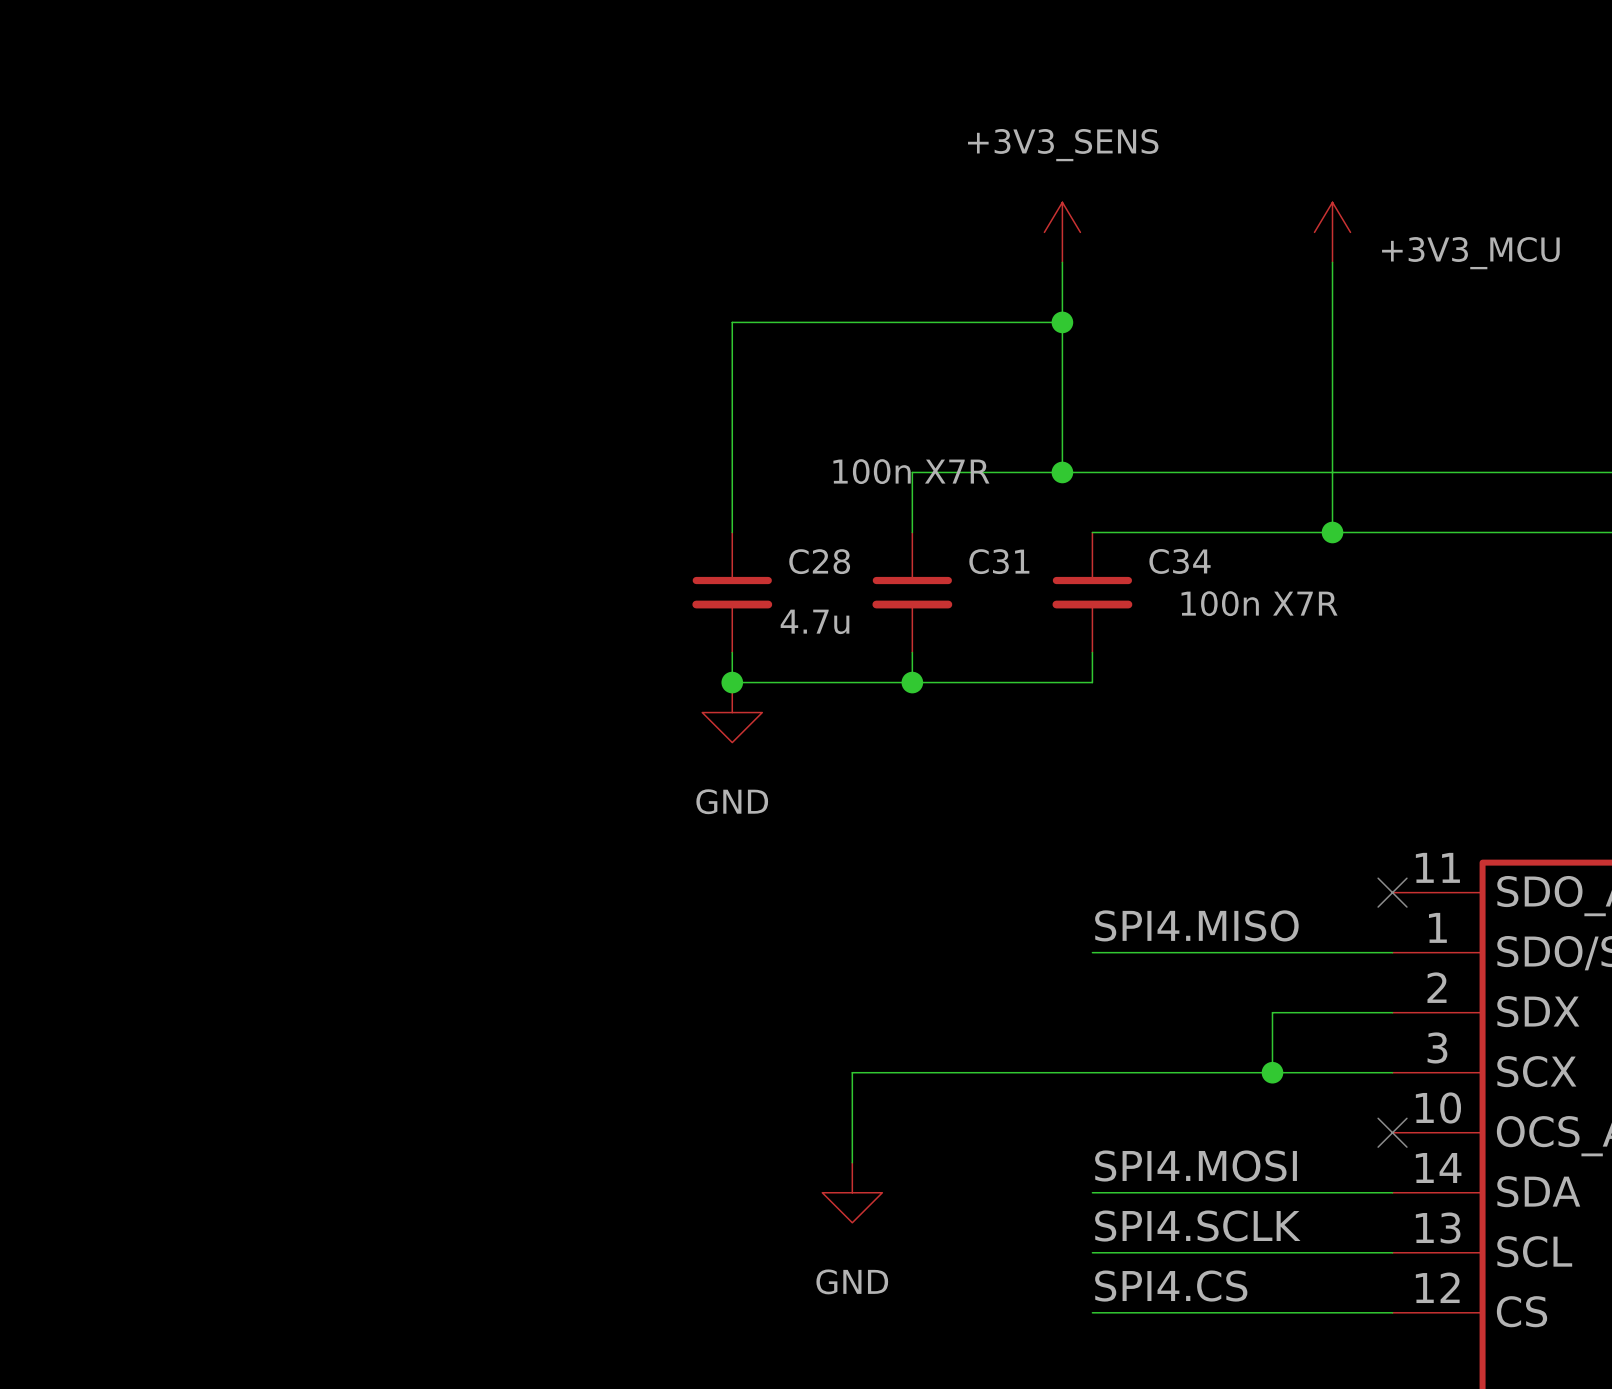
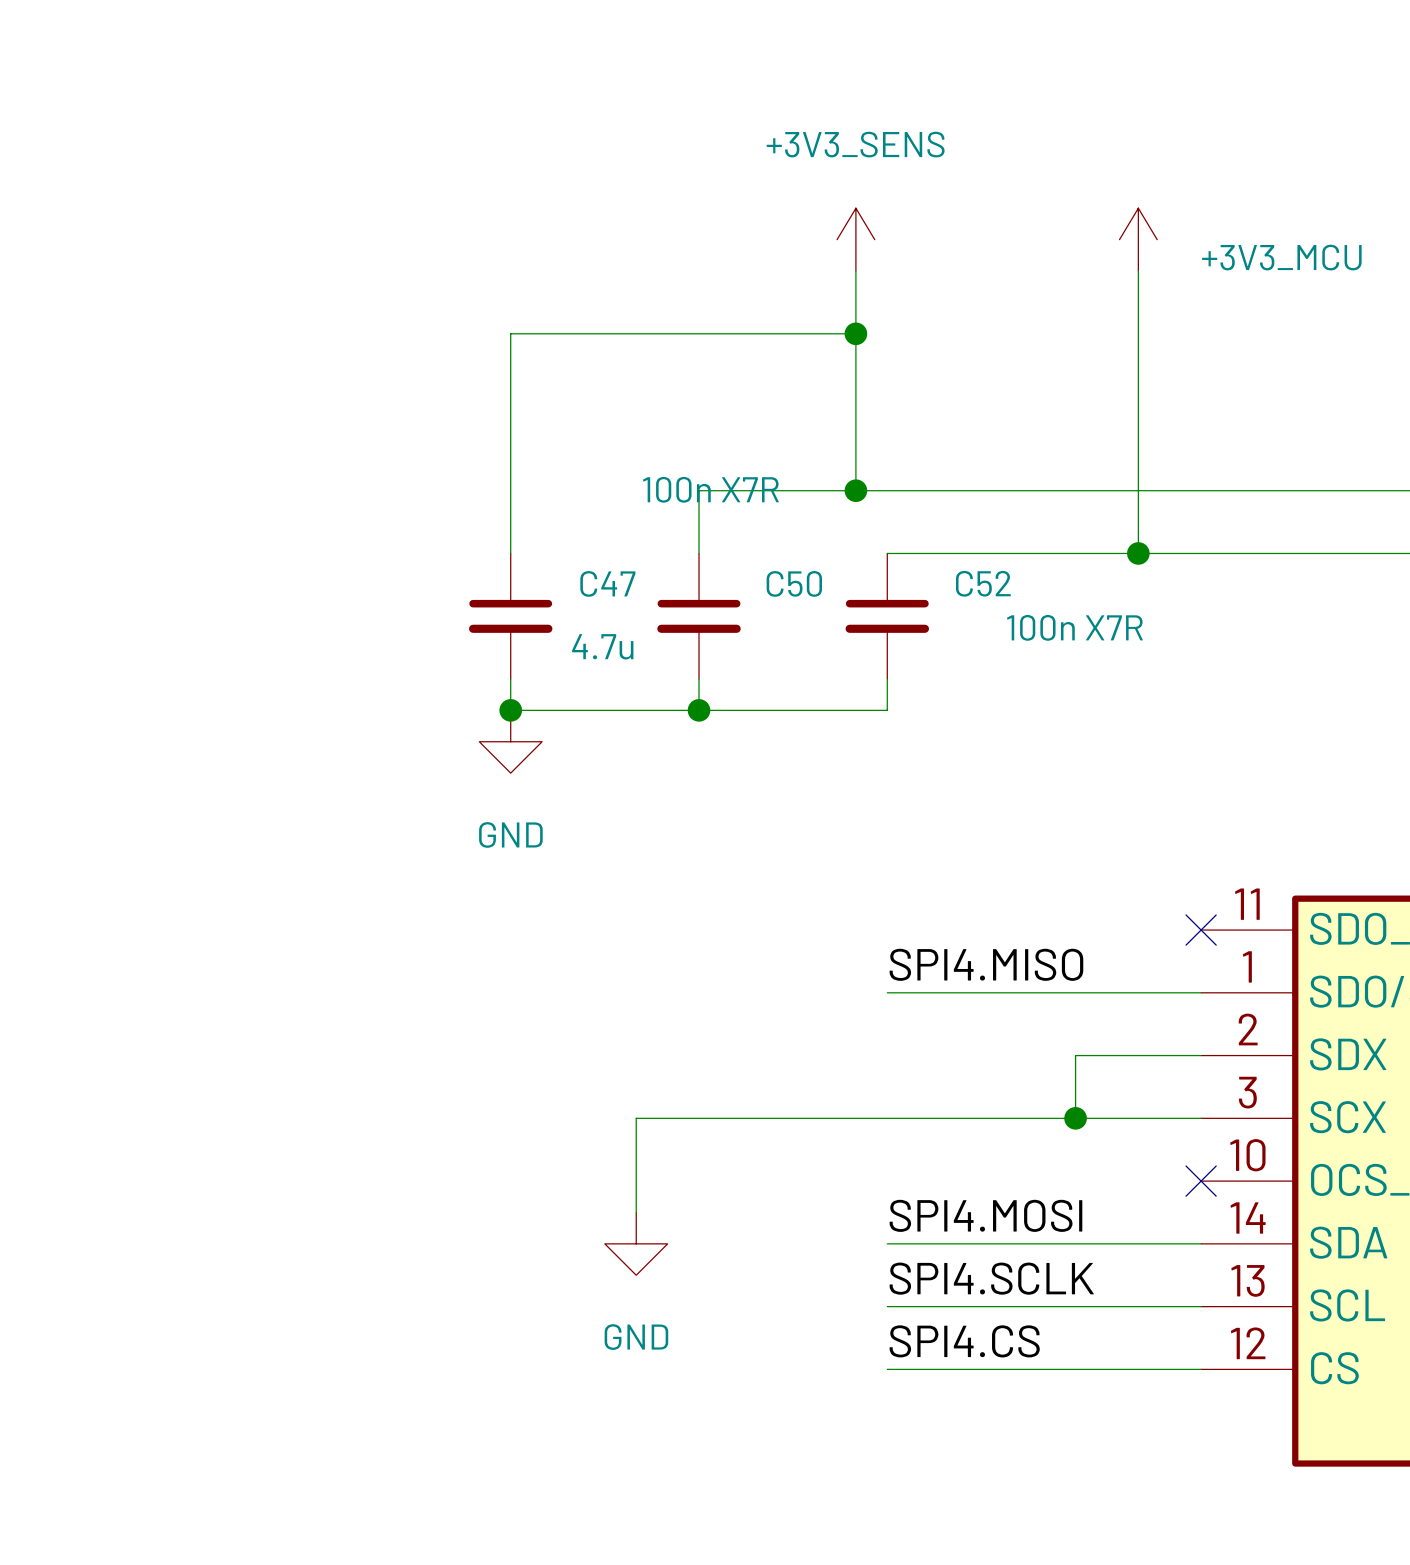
C28 name: C28 (819, 561) -> C47 (607, 583)
C31 name: C31 (999, 561) -> C50 (794, 583)
C34 name: C34 (1180, 561) -> C52 (983, 583)

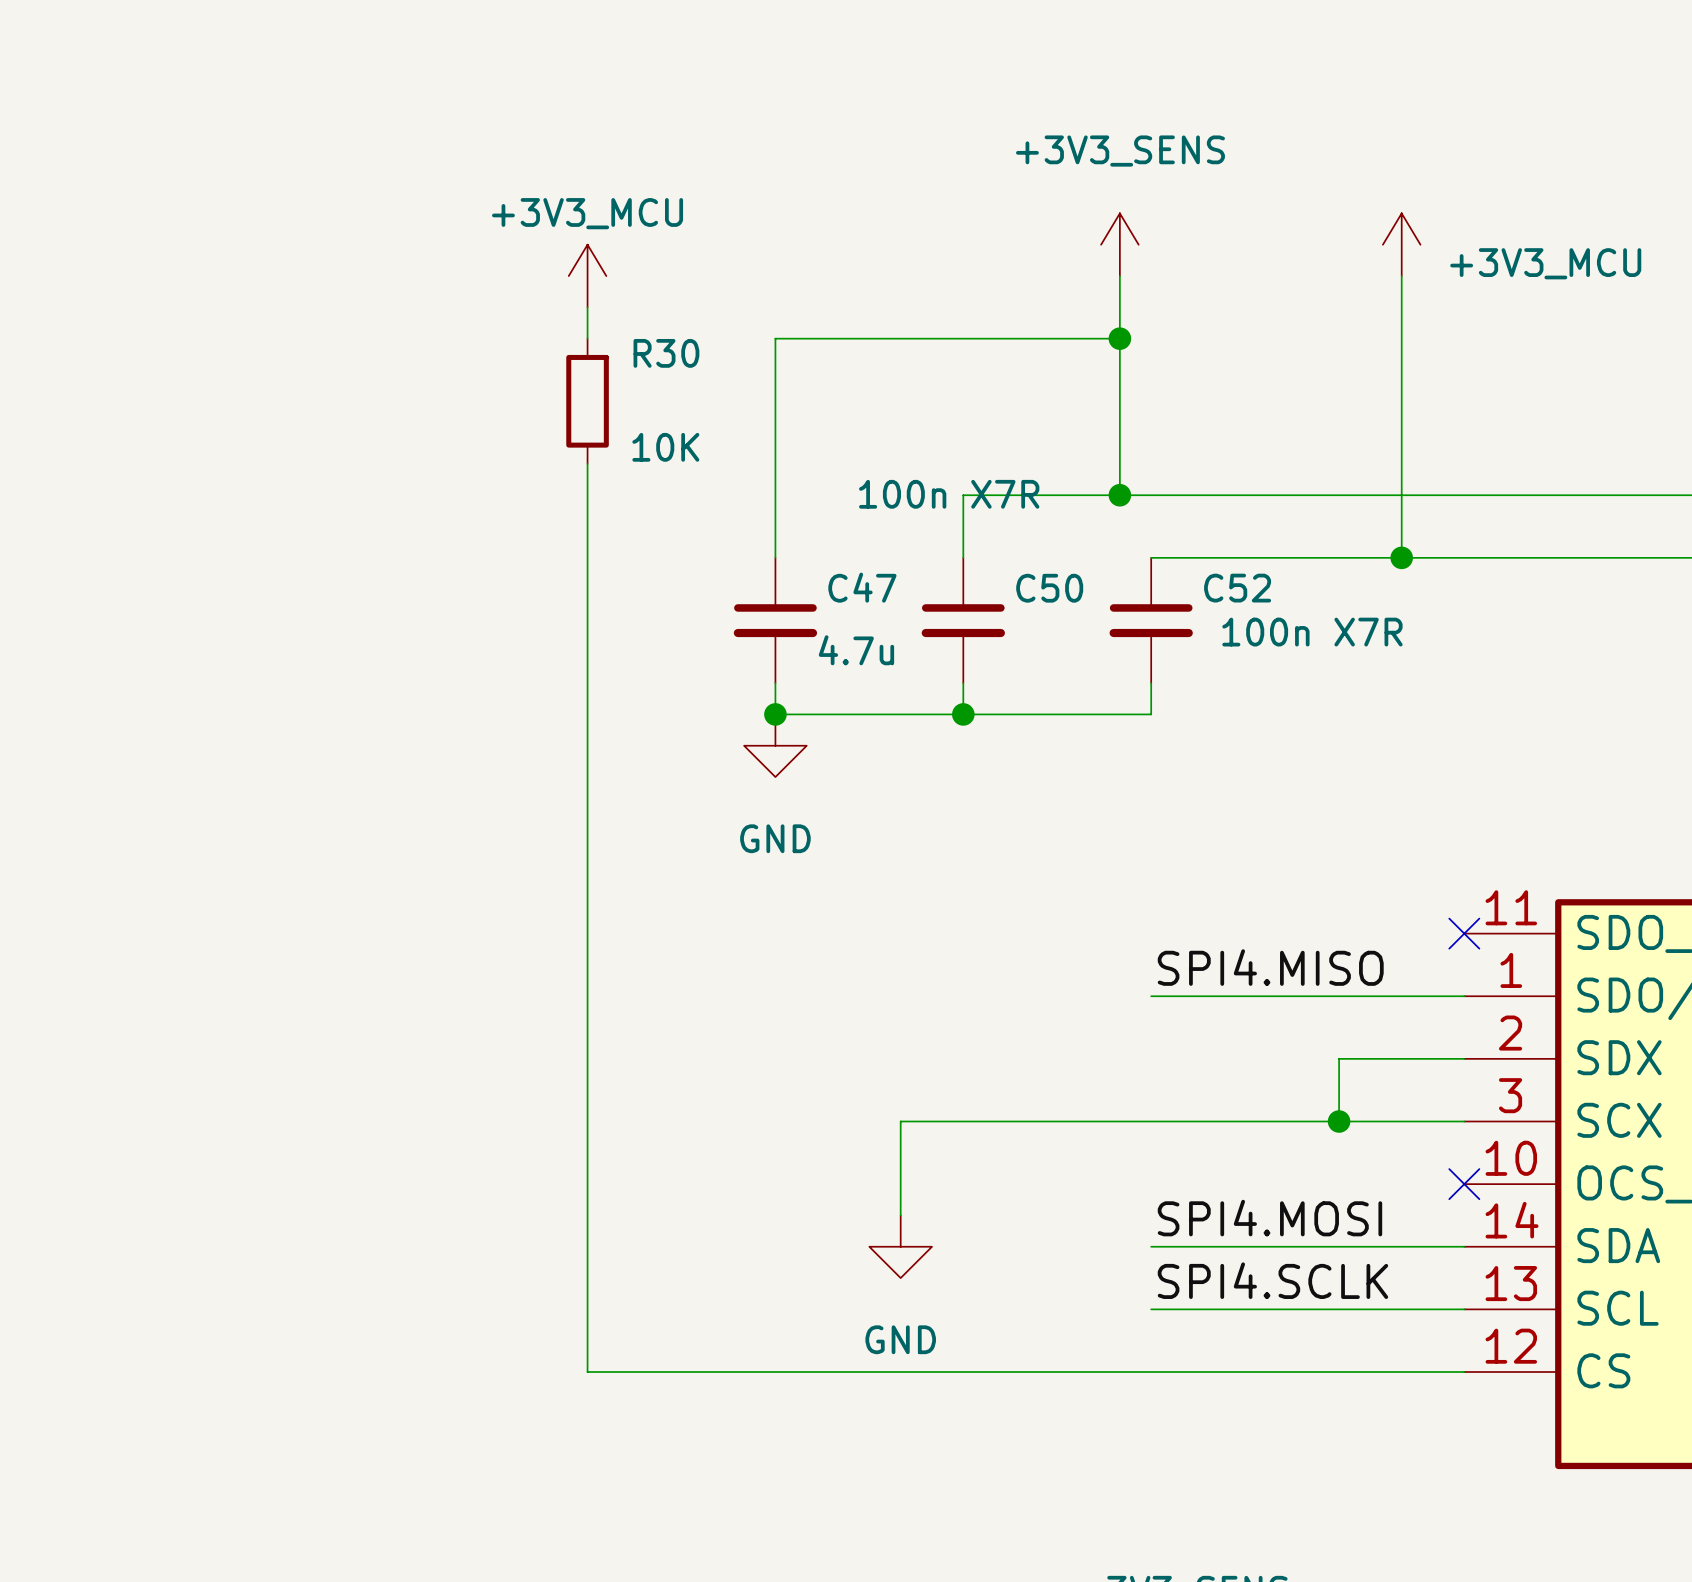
power symbol: none -> +3V3_MCU (587, 276)
wire: none -> (587, 307) (587, 338)
R30: none -> 10K (587, 401)
wire: none -> (587, 463) (587, 1372) (1151, 1372)
label: SPI4.CS (964, 1341) -> none

